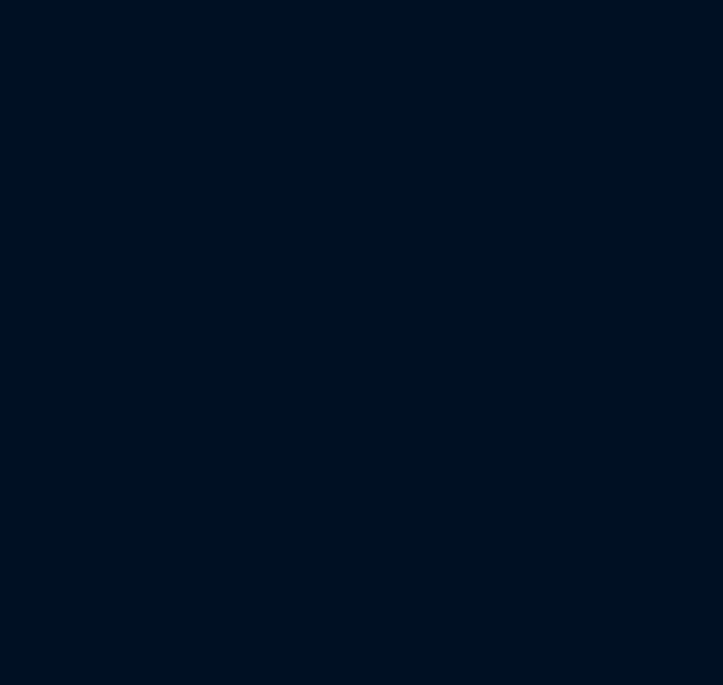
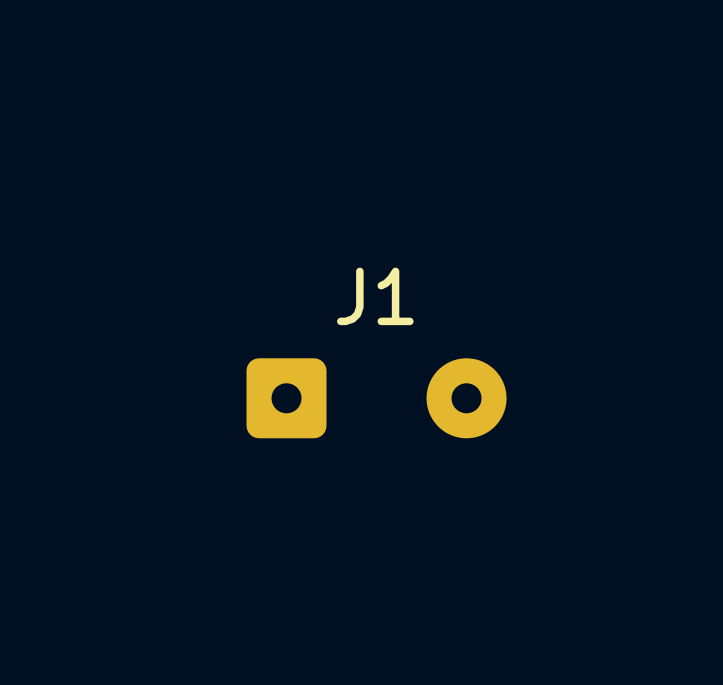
J1: none -> (376, 398)

